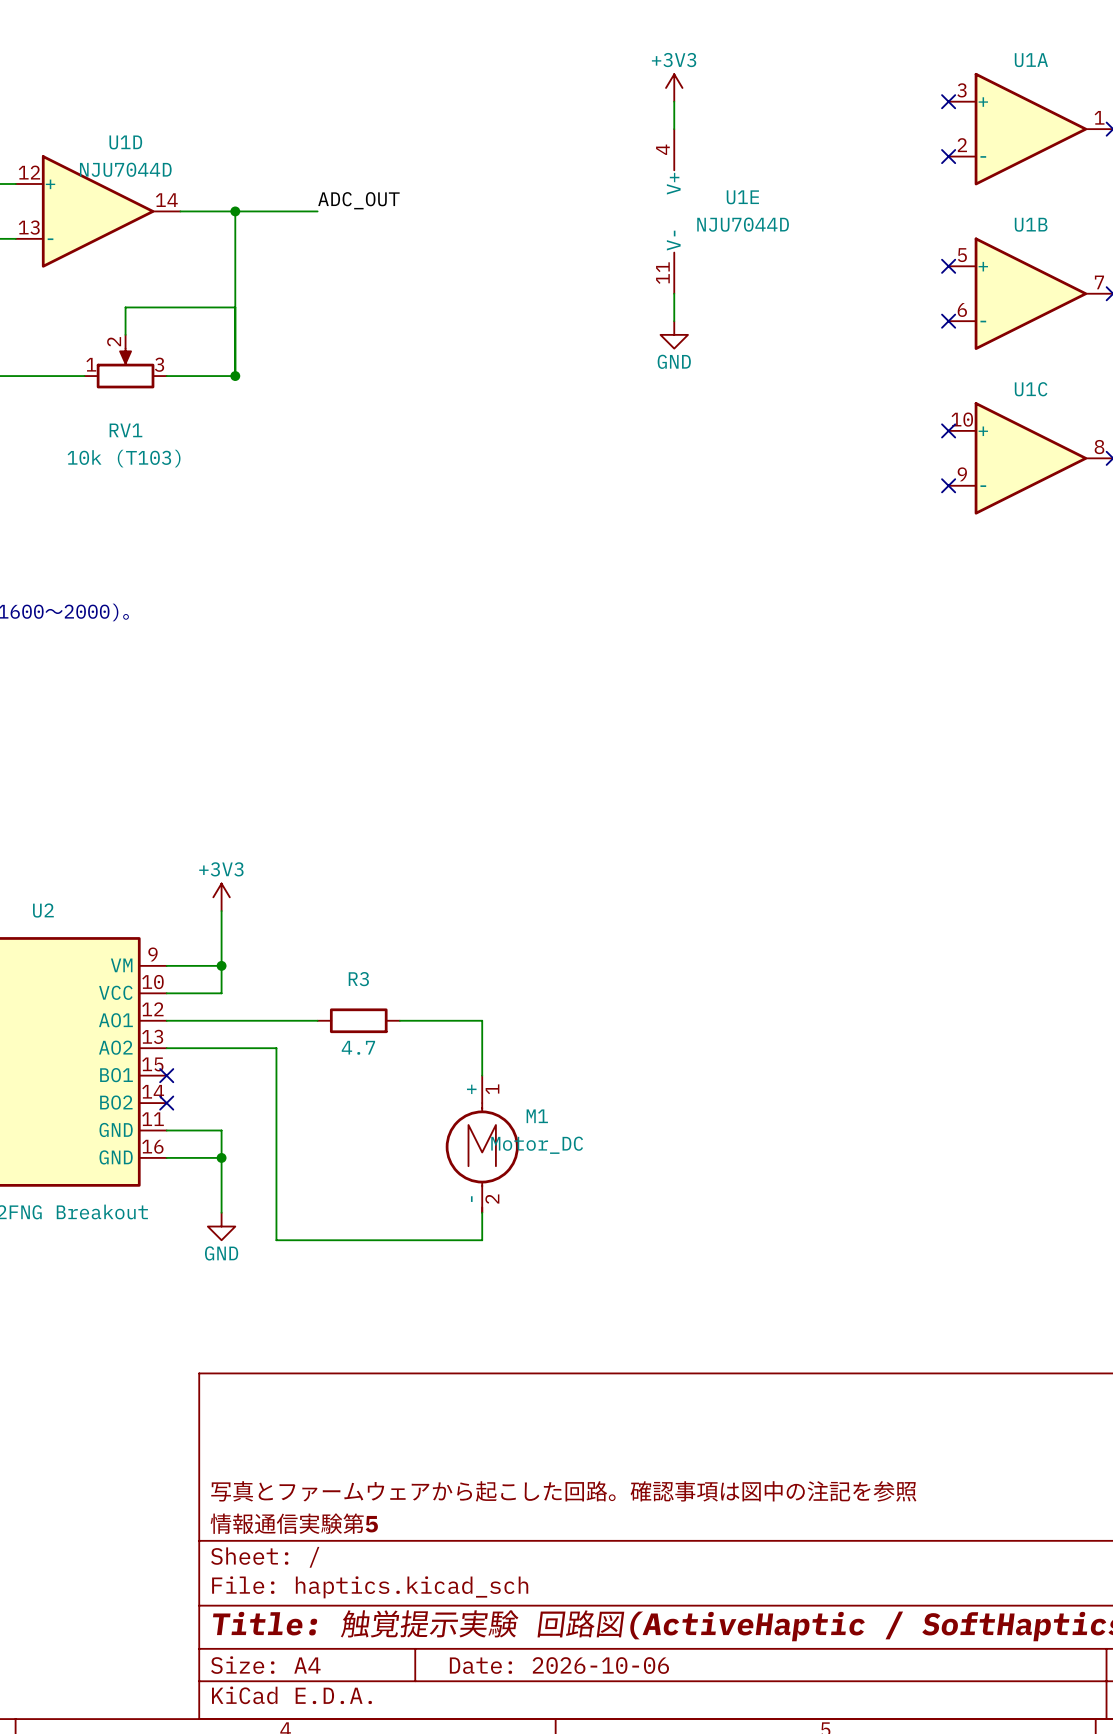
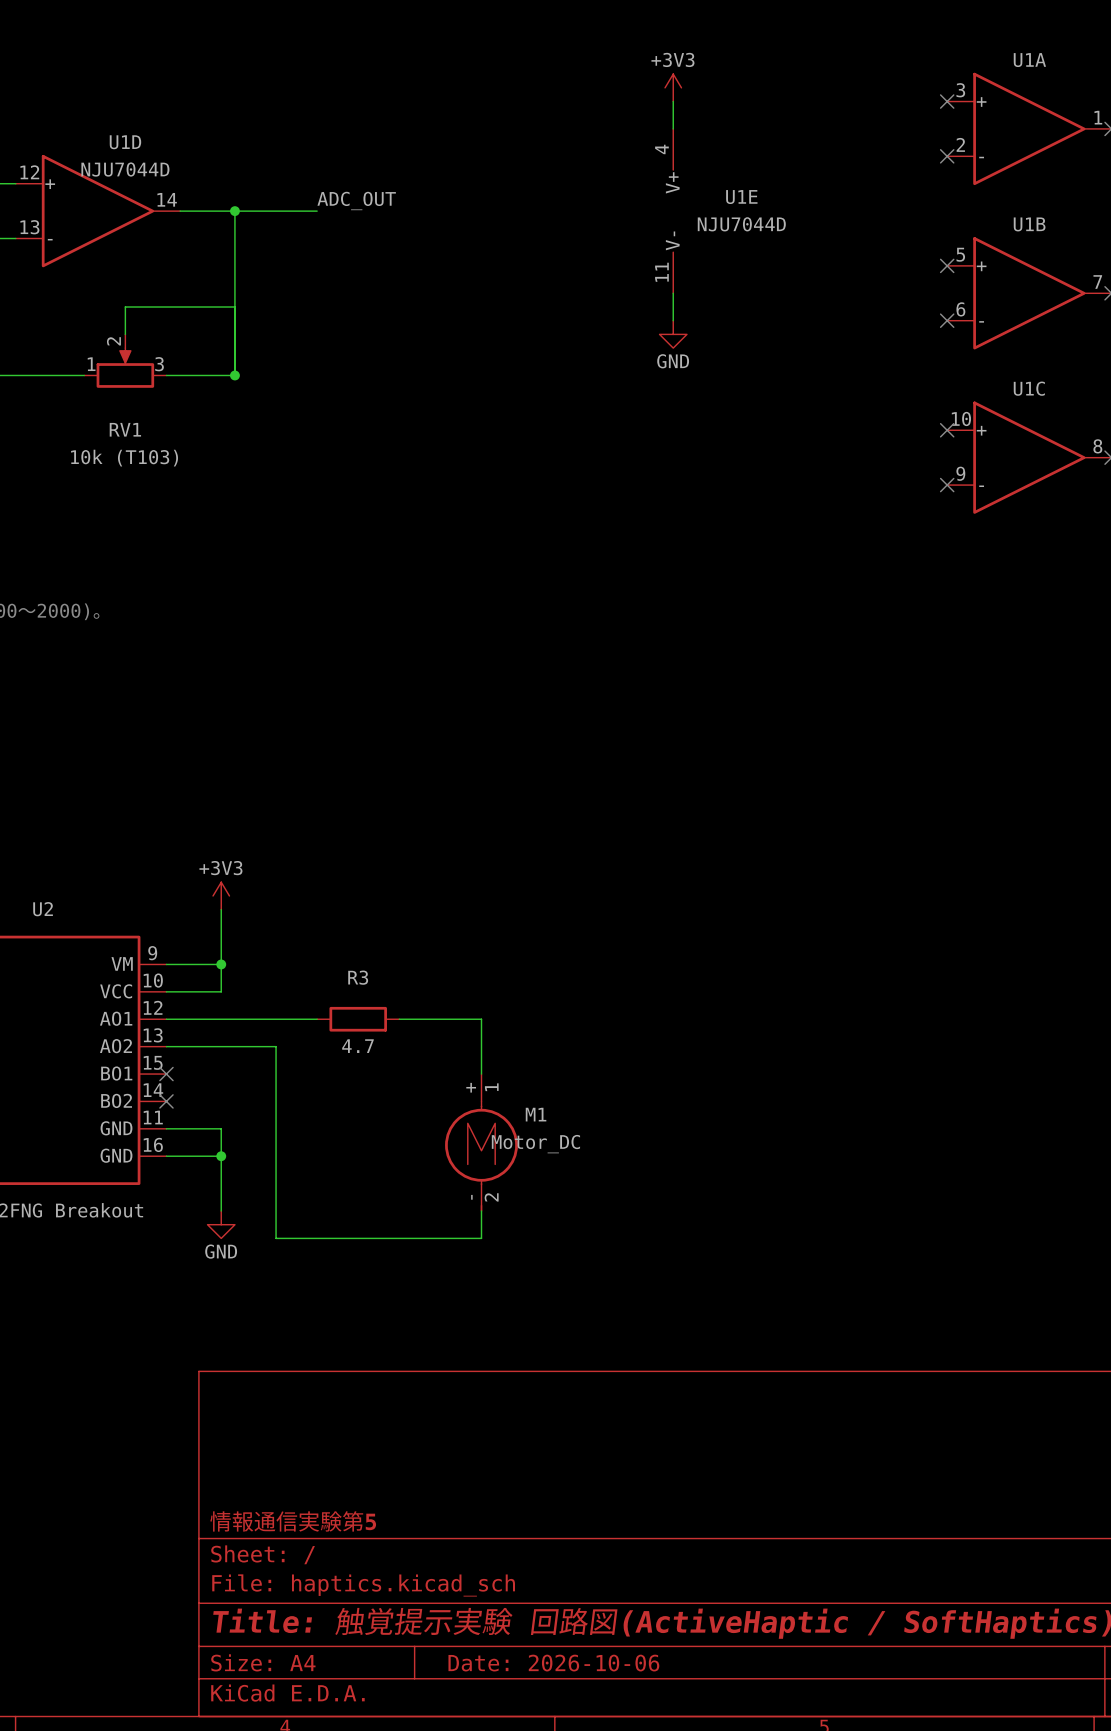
title block: 写真とファームウェアから起こした回路。確認事項は図中の注記を参照 (563, 1491) -> none

